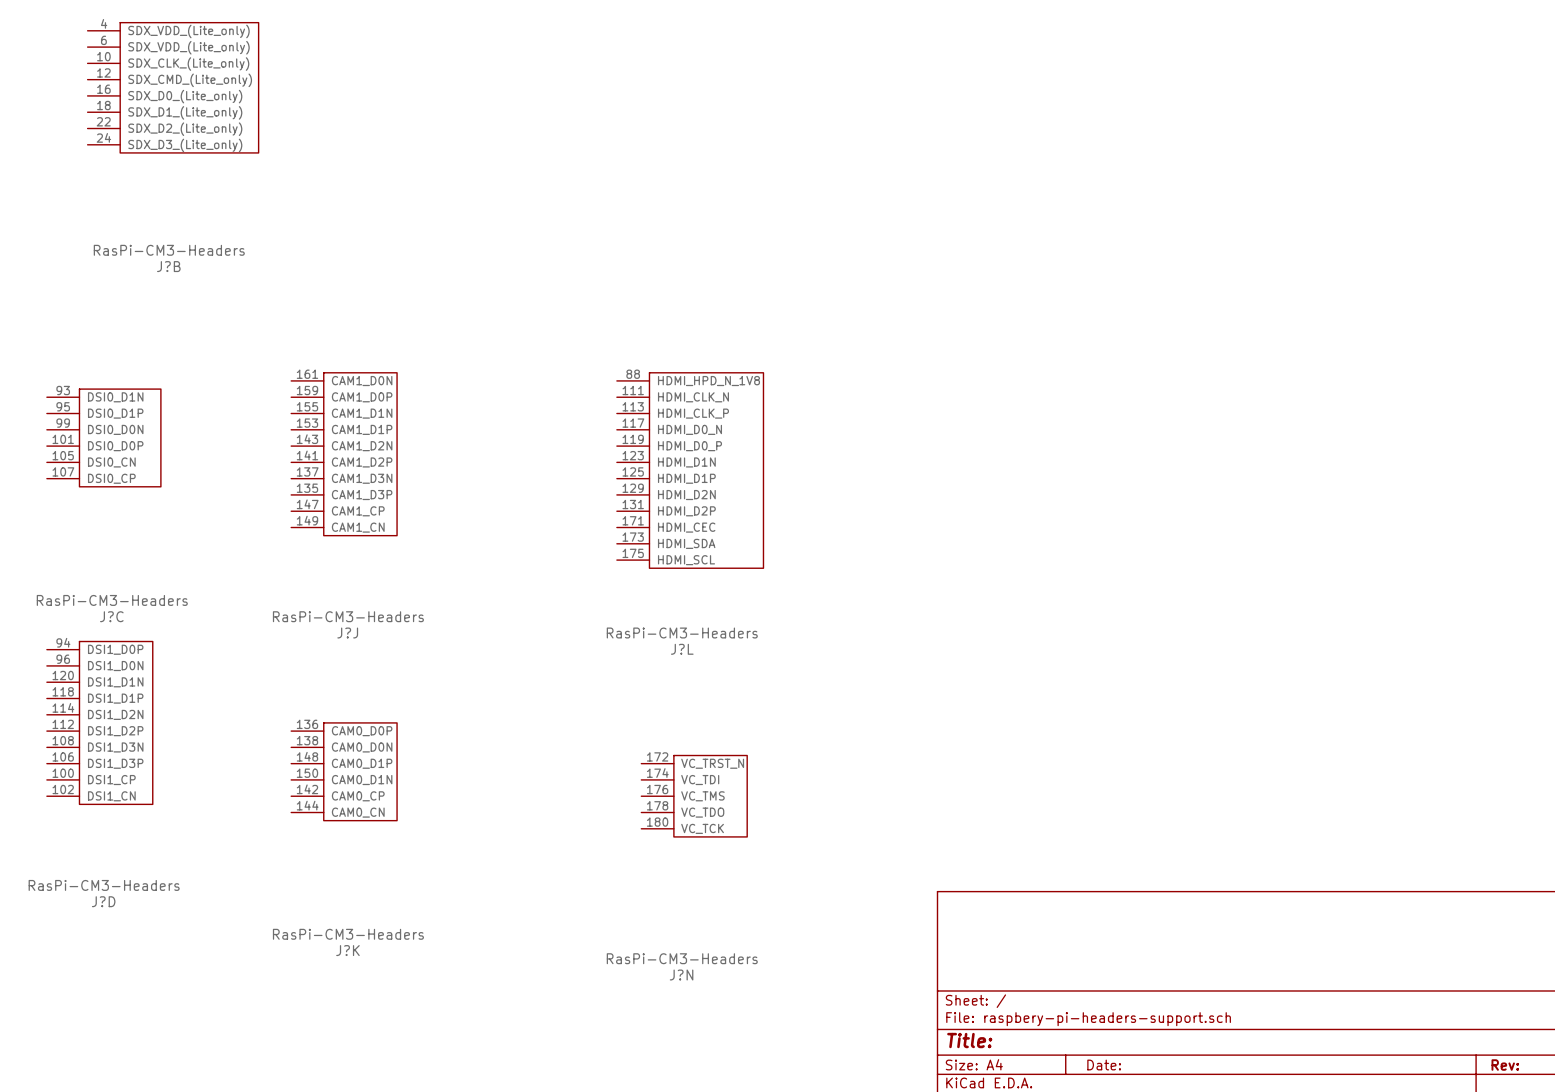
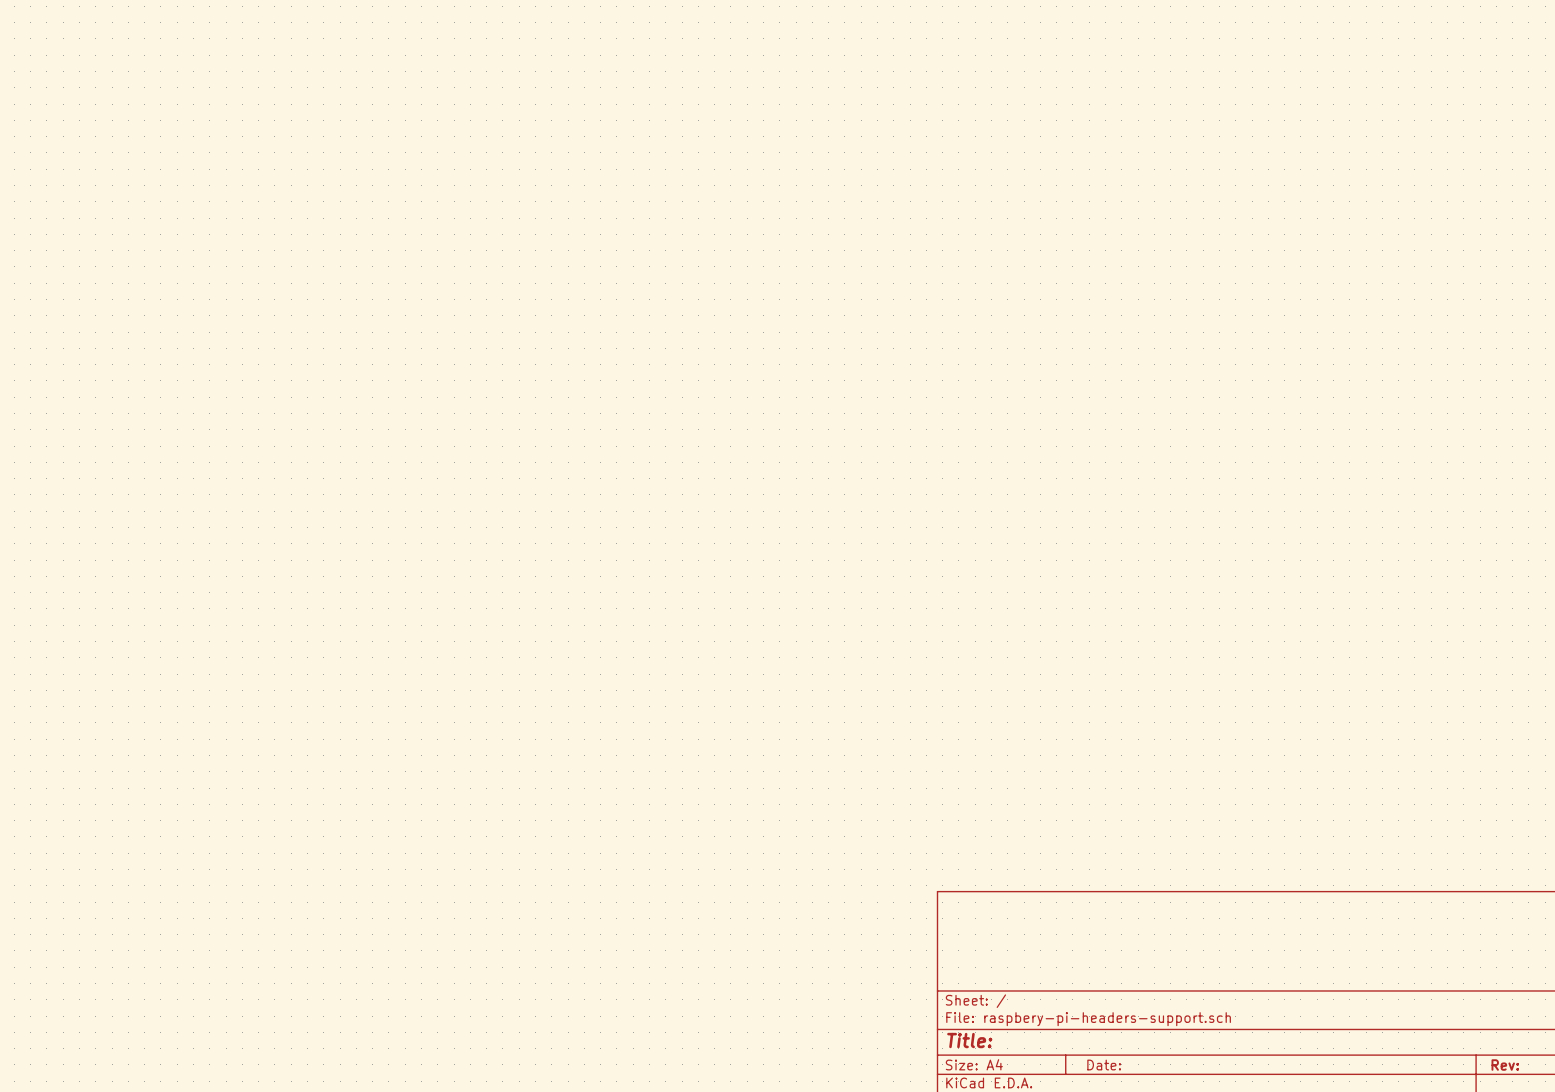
J?B: RasPi-CM3-Headers (173, 87) -> none
J?C: RasPi-CM3-Headers (103, 437) -> none
J?J: RasPi-CM3-Headers (344, 454) -> none
J?L: RasPi-CM3-Headers (690, 470) -> none
J?D: RasPi-CM3-Headers (99, 722) -> none
J?K: RasPi-CM3-Headers (344, 771) -> none
J?N: RasPi-CM3-Headers (694, 796) -> none

